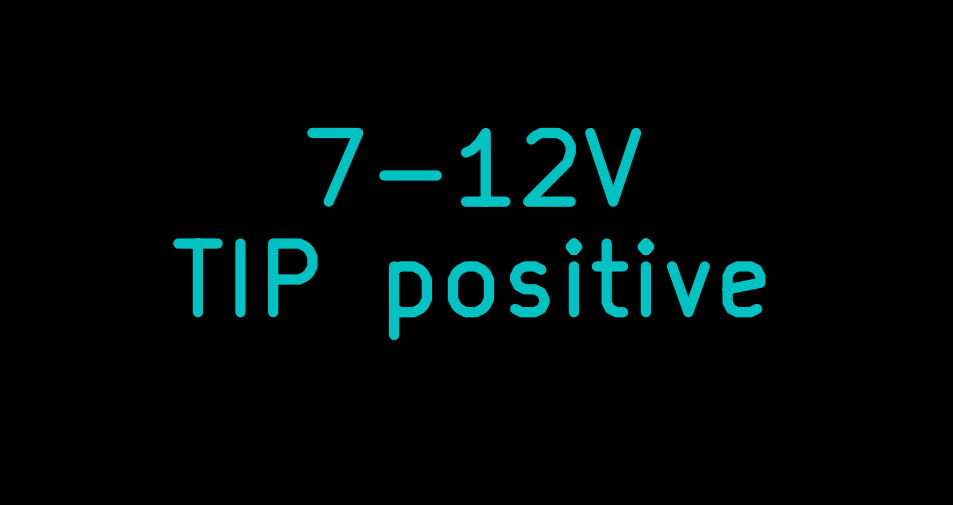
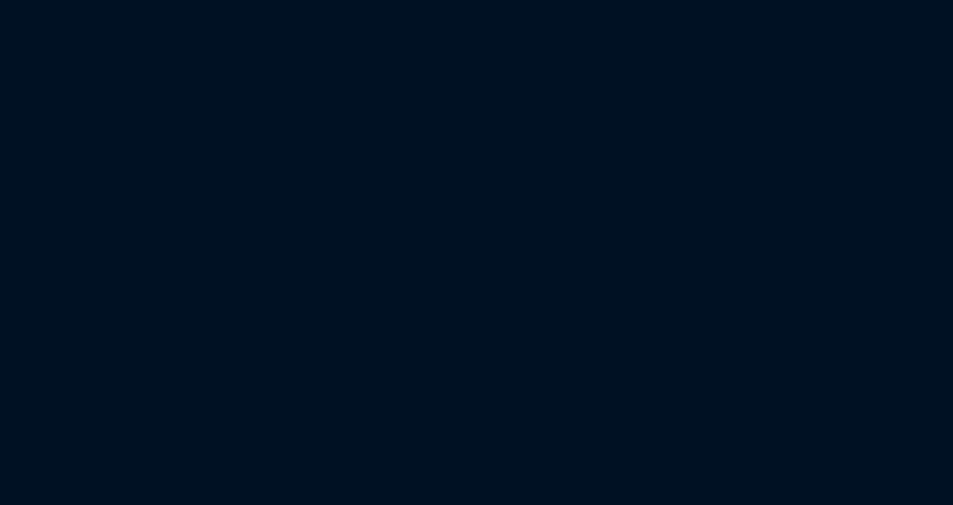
text: 7-12V (474, 167) -> none
text: TIP positive (469, 289) -> none

